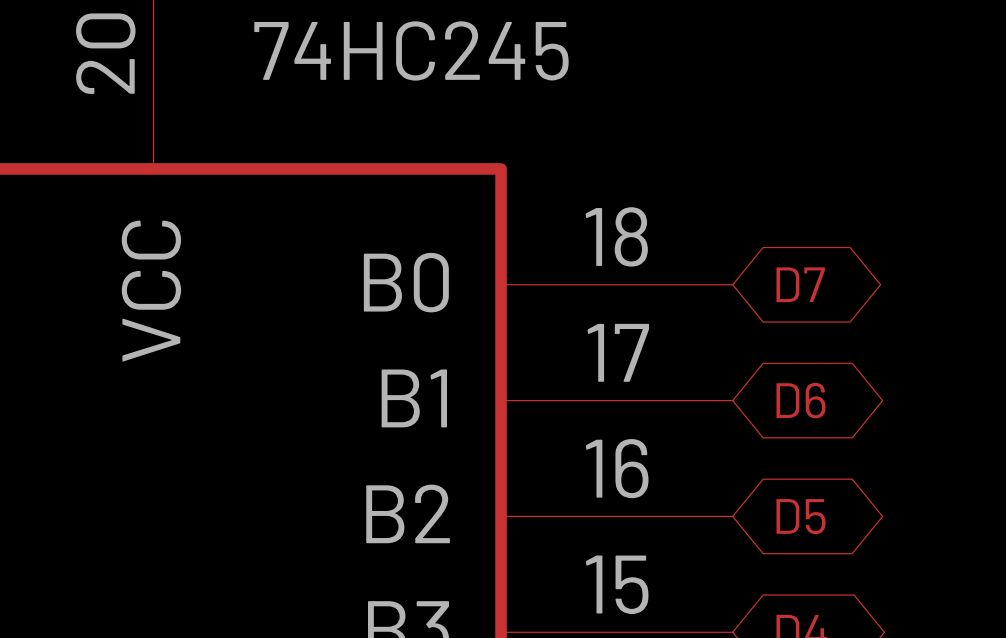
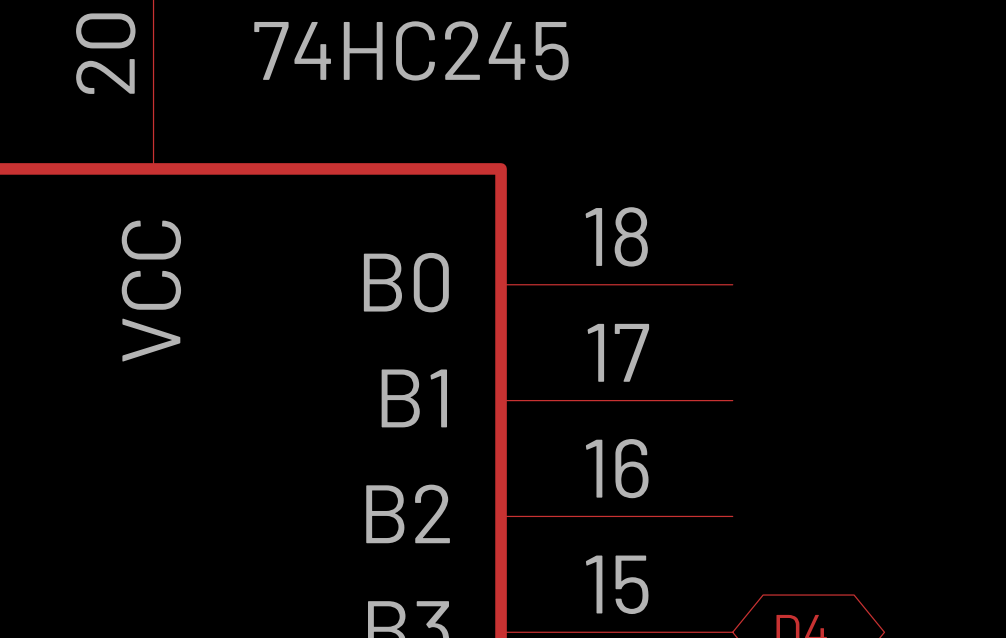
global label: D7 (800, 284) -> none
global label: D6 (801, 400) -> none
global label: D5 (801, 516) -> none

